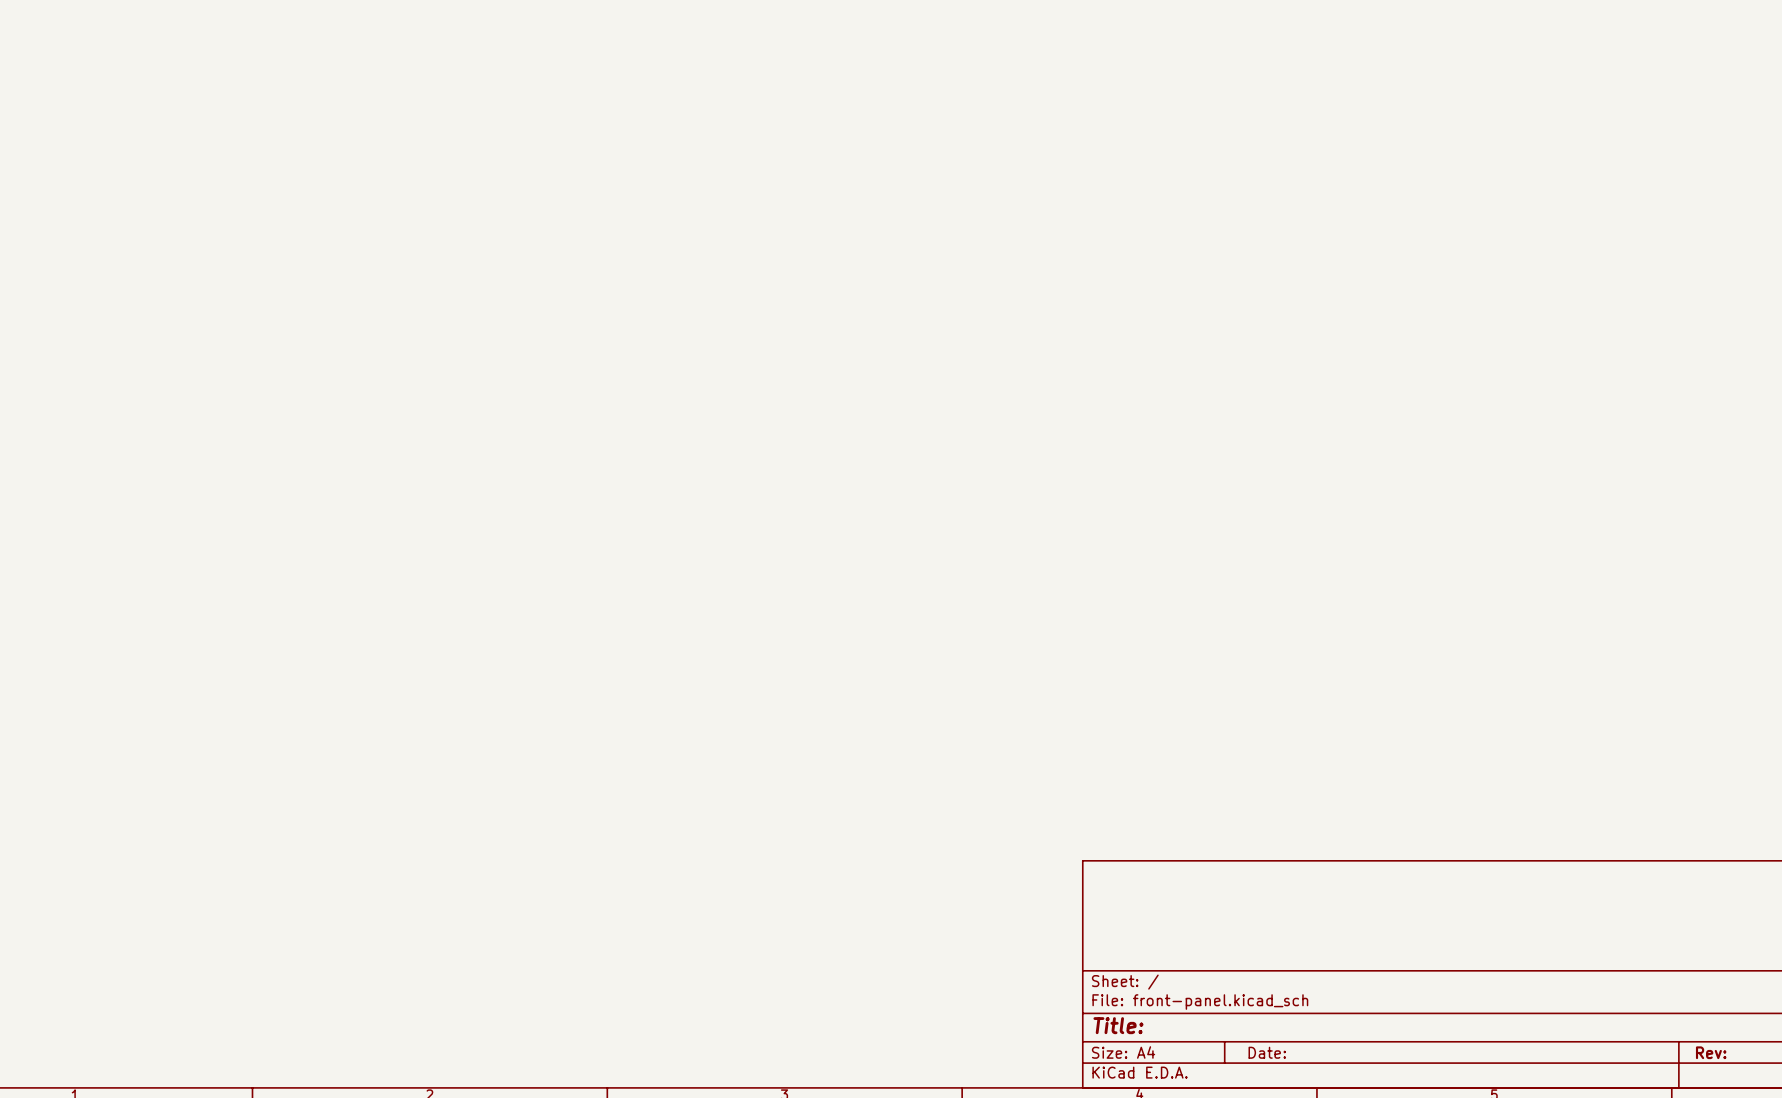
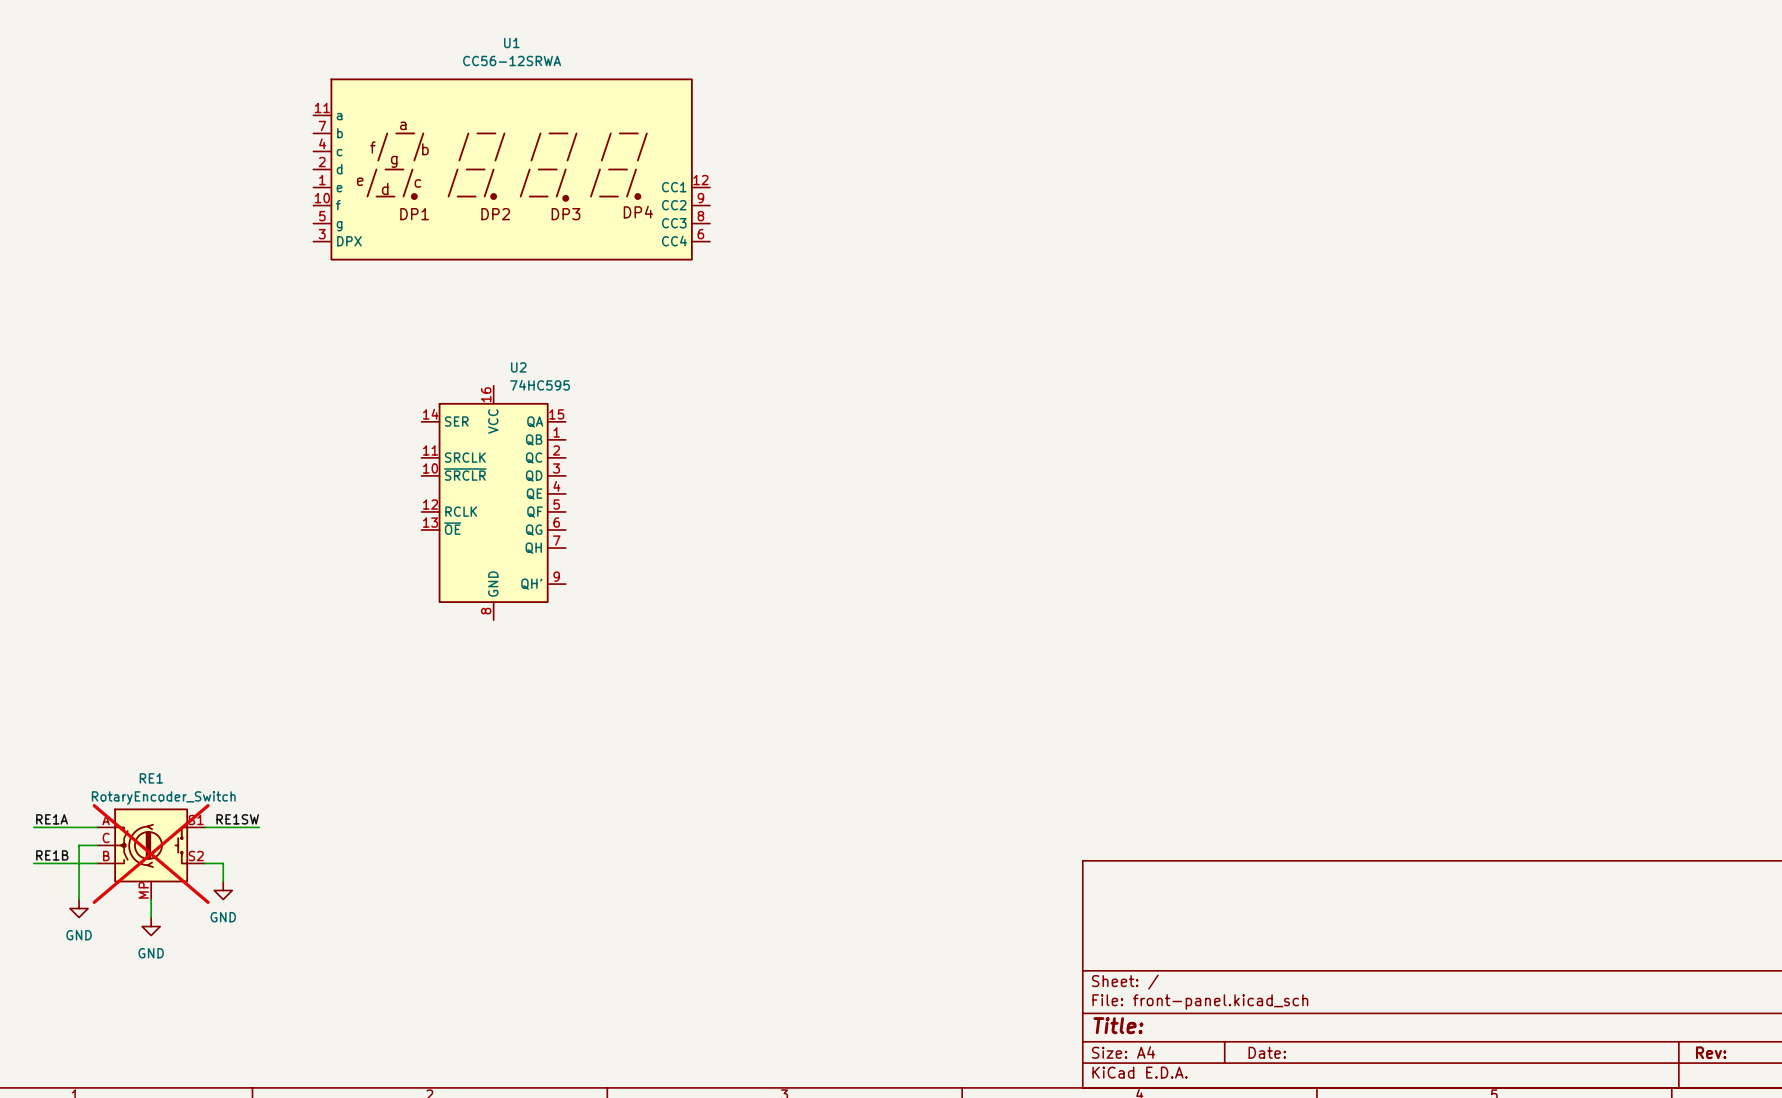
U1: none -> CC56-12SRWA (511, 169)
U2: none -> 74HC595 (493, 502)
label: none -> RE1A (52, 819)
label: none -> RE1SW (237, 819)
wire: none -> (33, 827) (97, 827)
wire: none -> (205, 827) (259, 827)
wire: none -> (97, 845) (79, 845) (79, 899)
RE1: none -> RotaryEncoder_Switch (151, 853)
label: none -> RE1B (52, 855)
wire: none -> (33, 863) (97, 863)
wire: none -> (205, 863) (223, 863) (223, 881)
power symbol: none -> GND (223, 890)
wire: none -> (151, 899) (151, 917)
power symbol: none -> GND (79, 908)
power symbol: none -> GND (151, 926)

